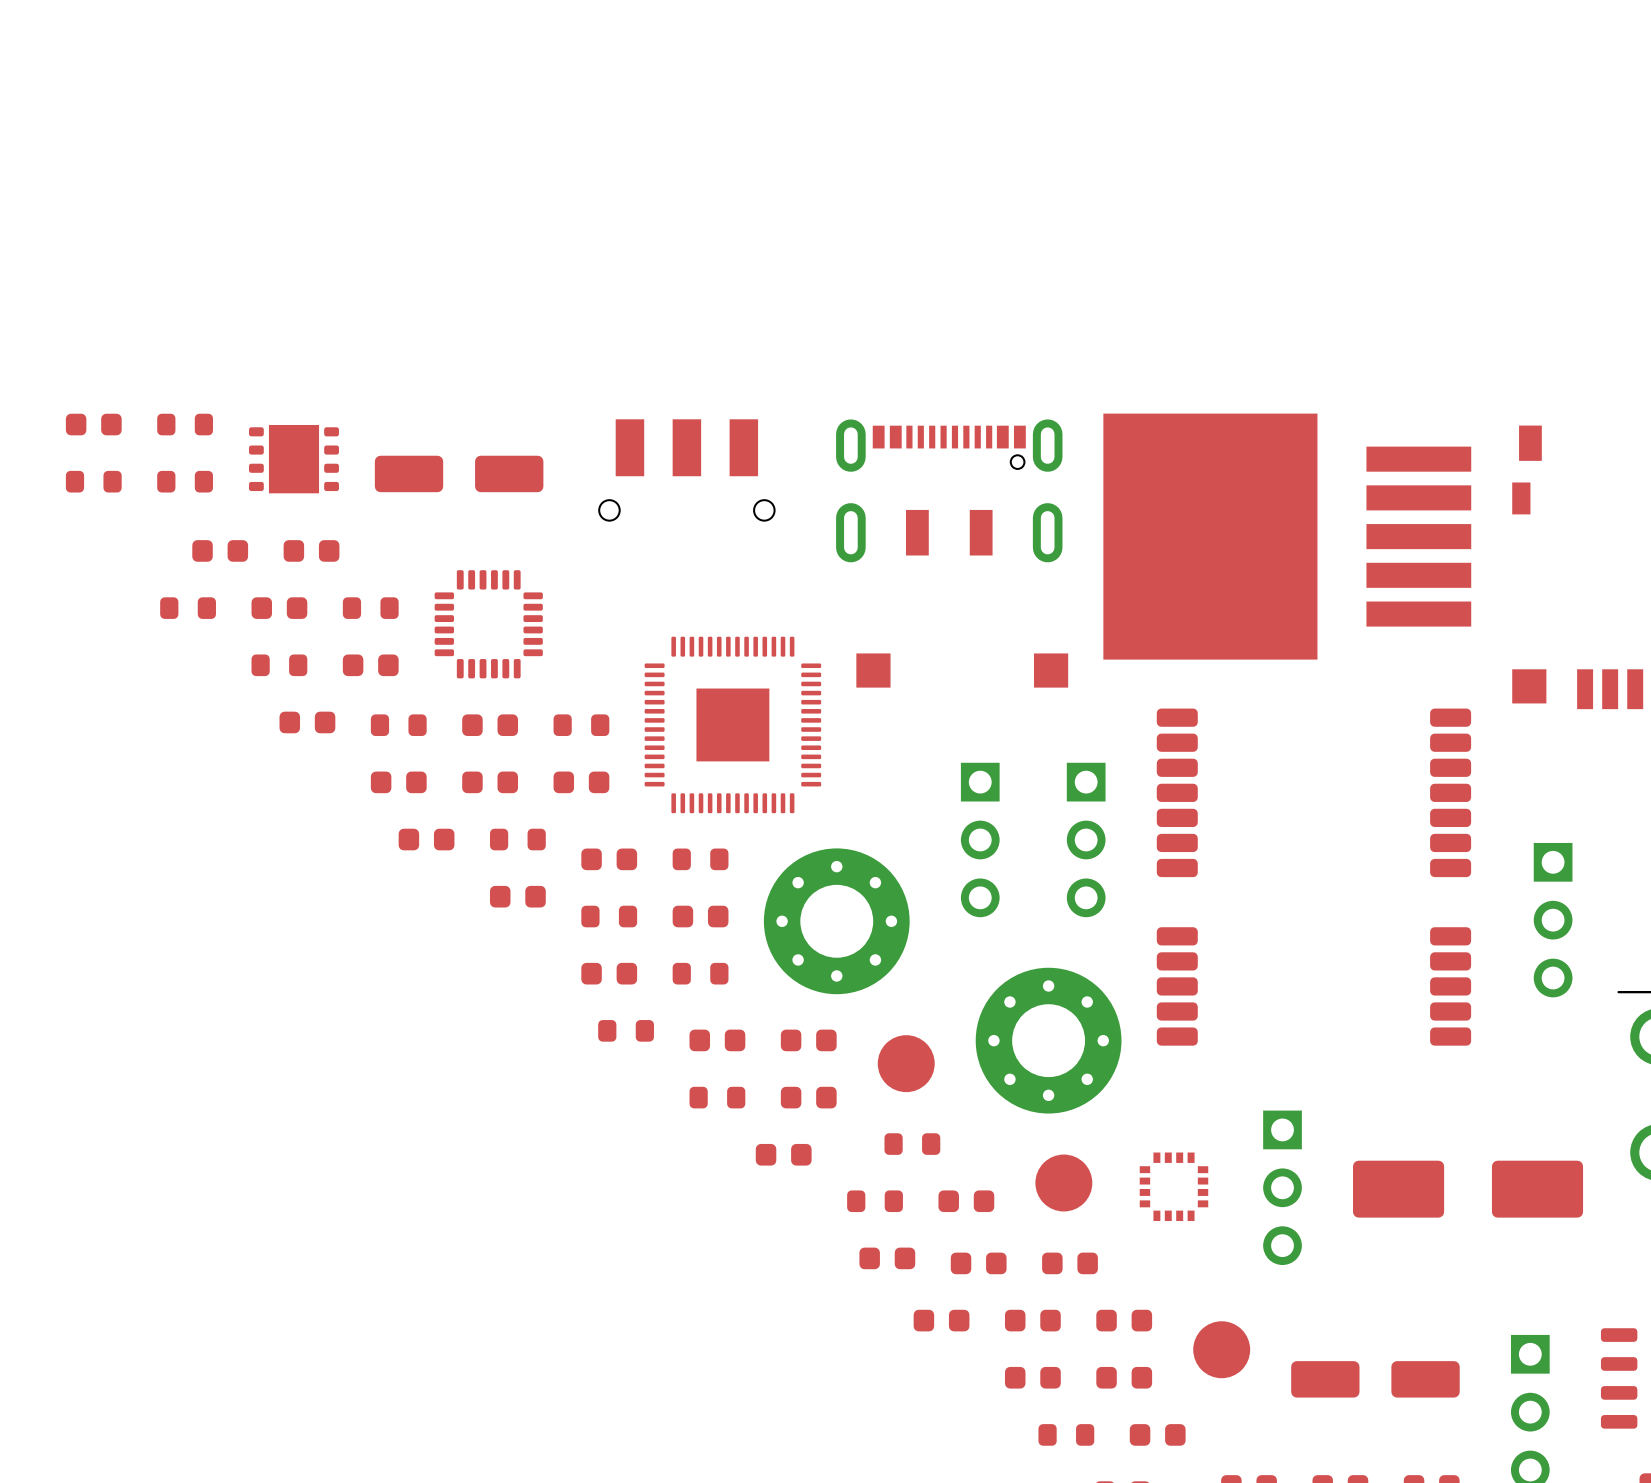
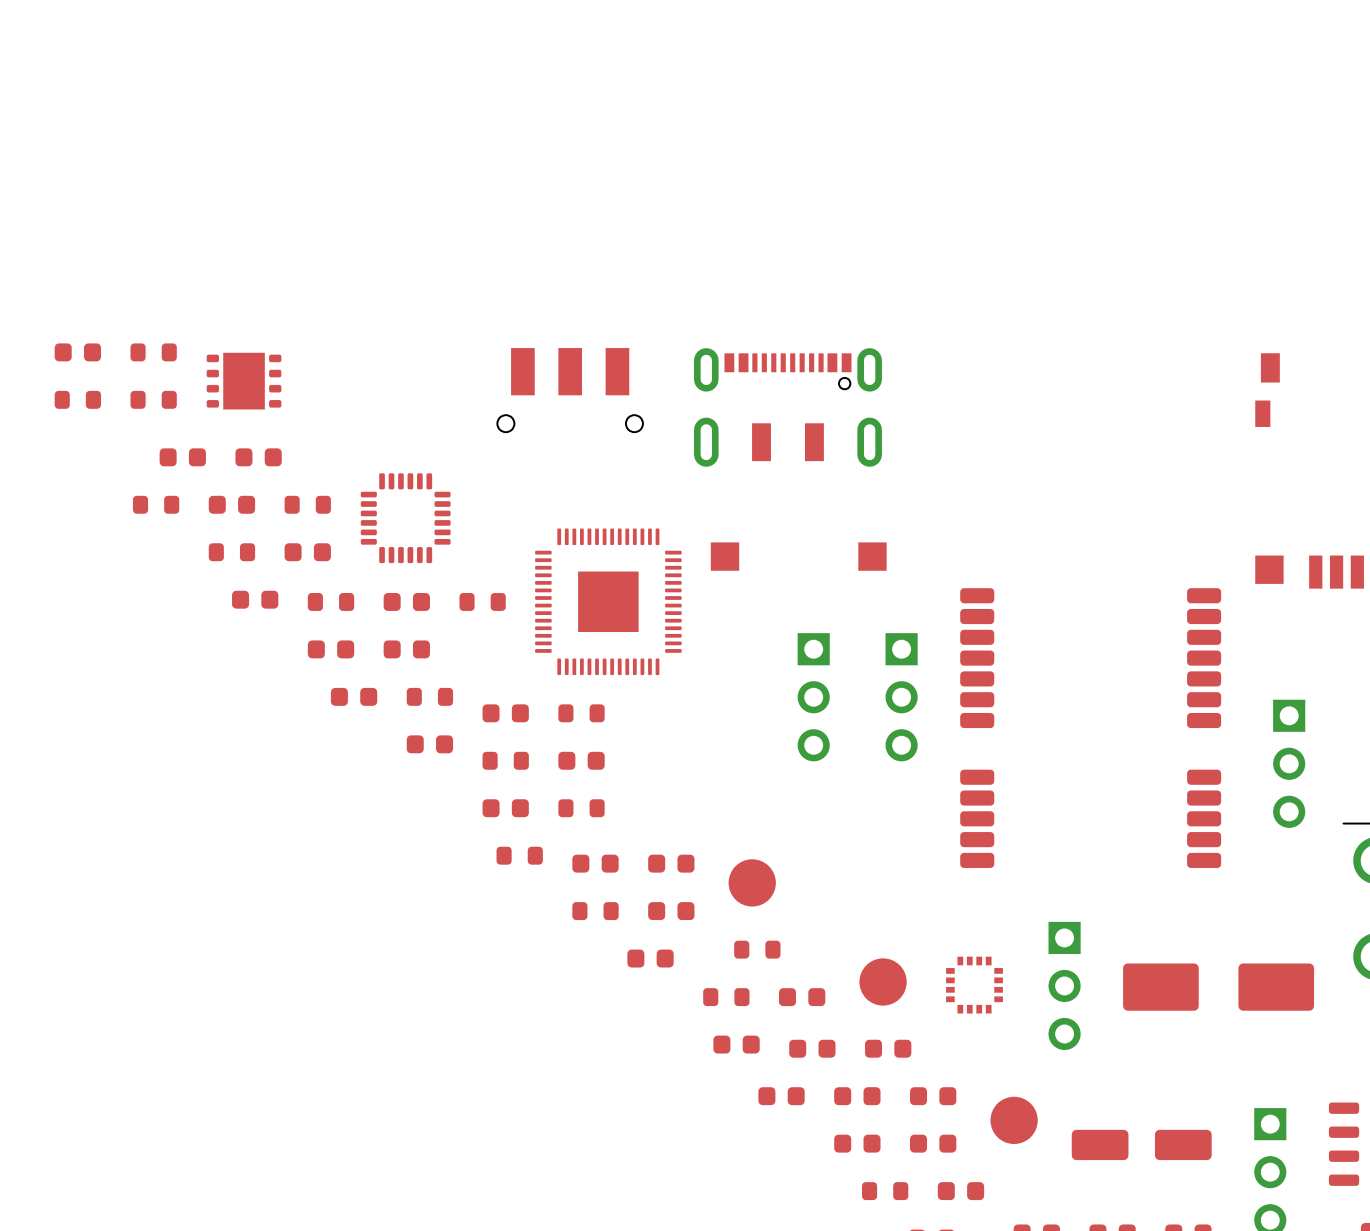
part: (459, 473) -> none
part: (1287, 536) -> none
part: (581, 782) -> none
part: (836, 921) -> none
part: (1048, 1040) -> none

